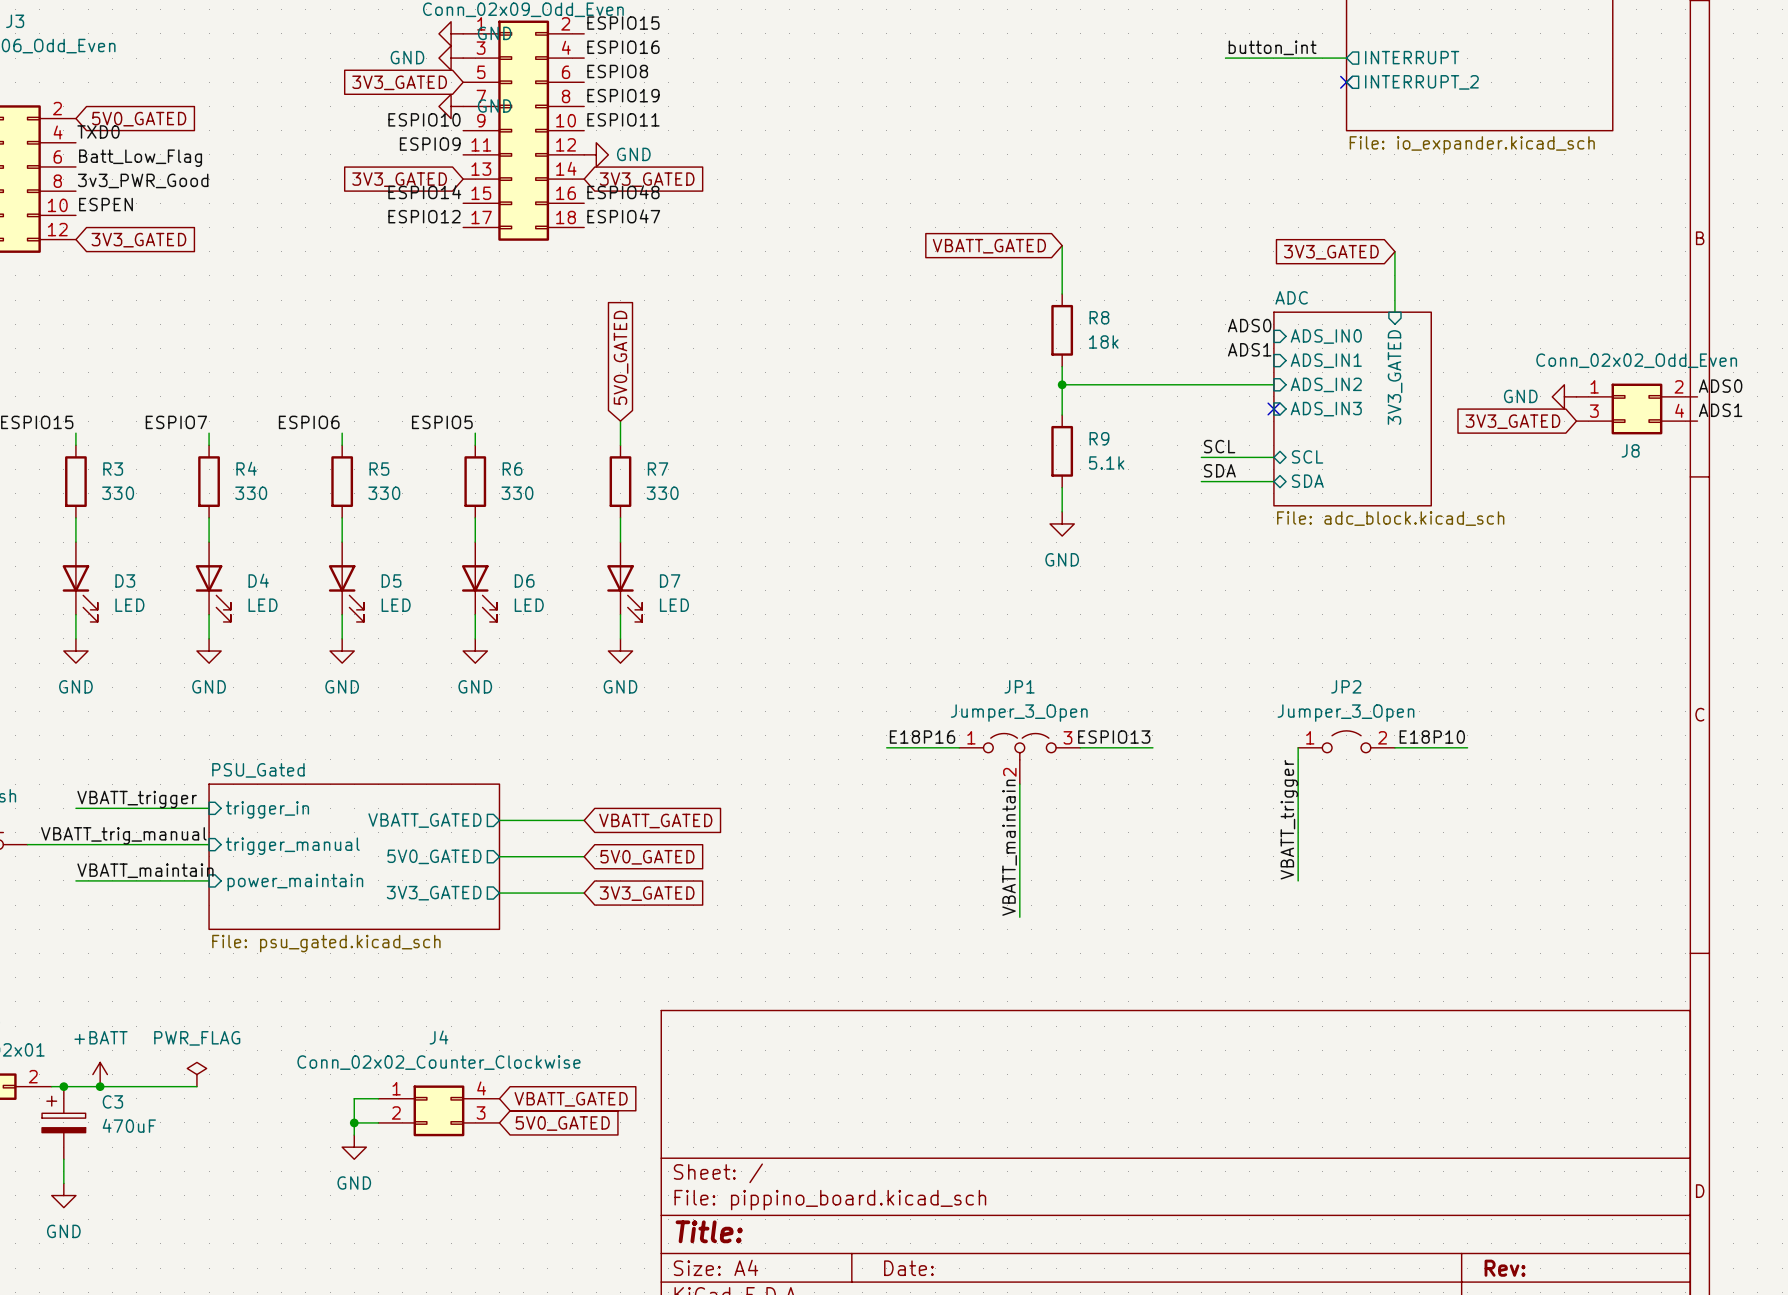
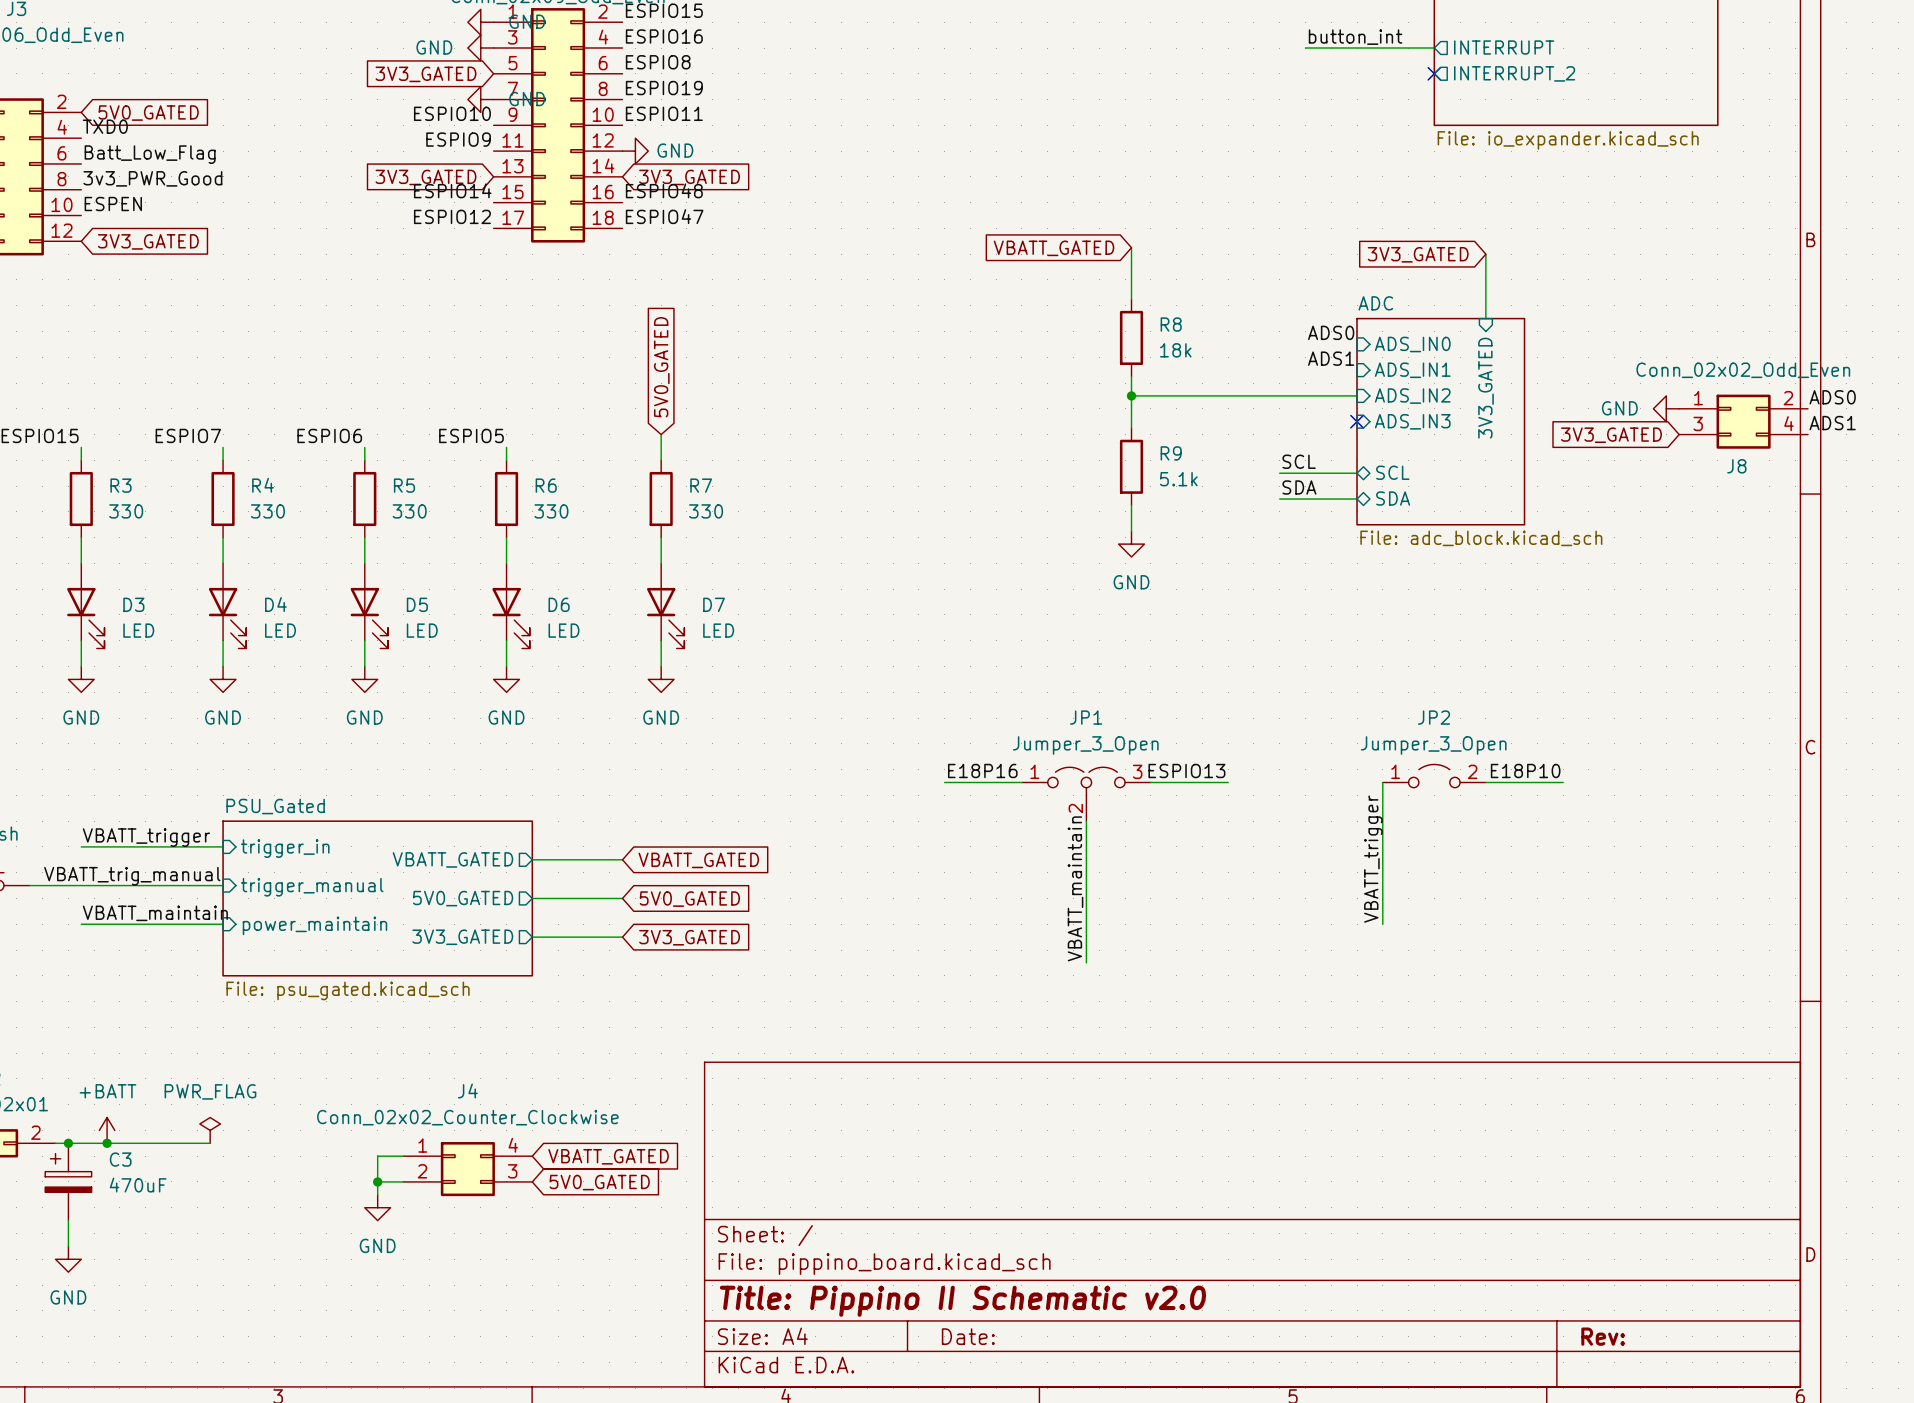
title block: Title: (709, 1231) -> Title: Pippino II Schematic v2.0 (962, 1301)

